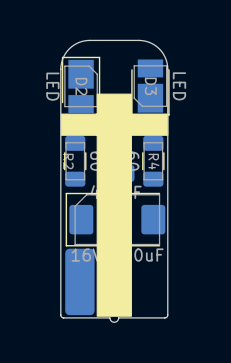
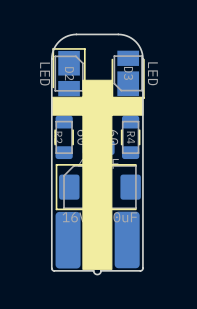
part: none -> (127, 239)

